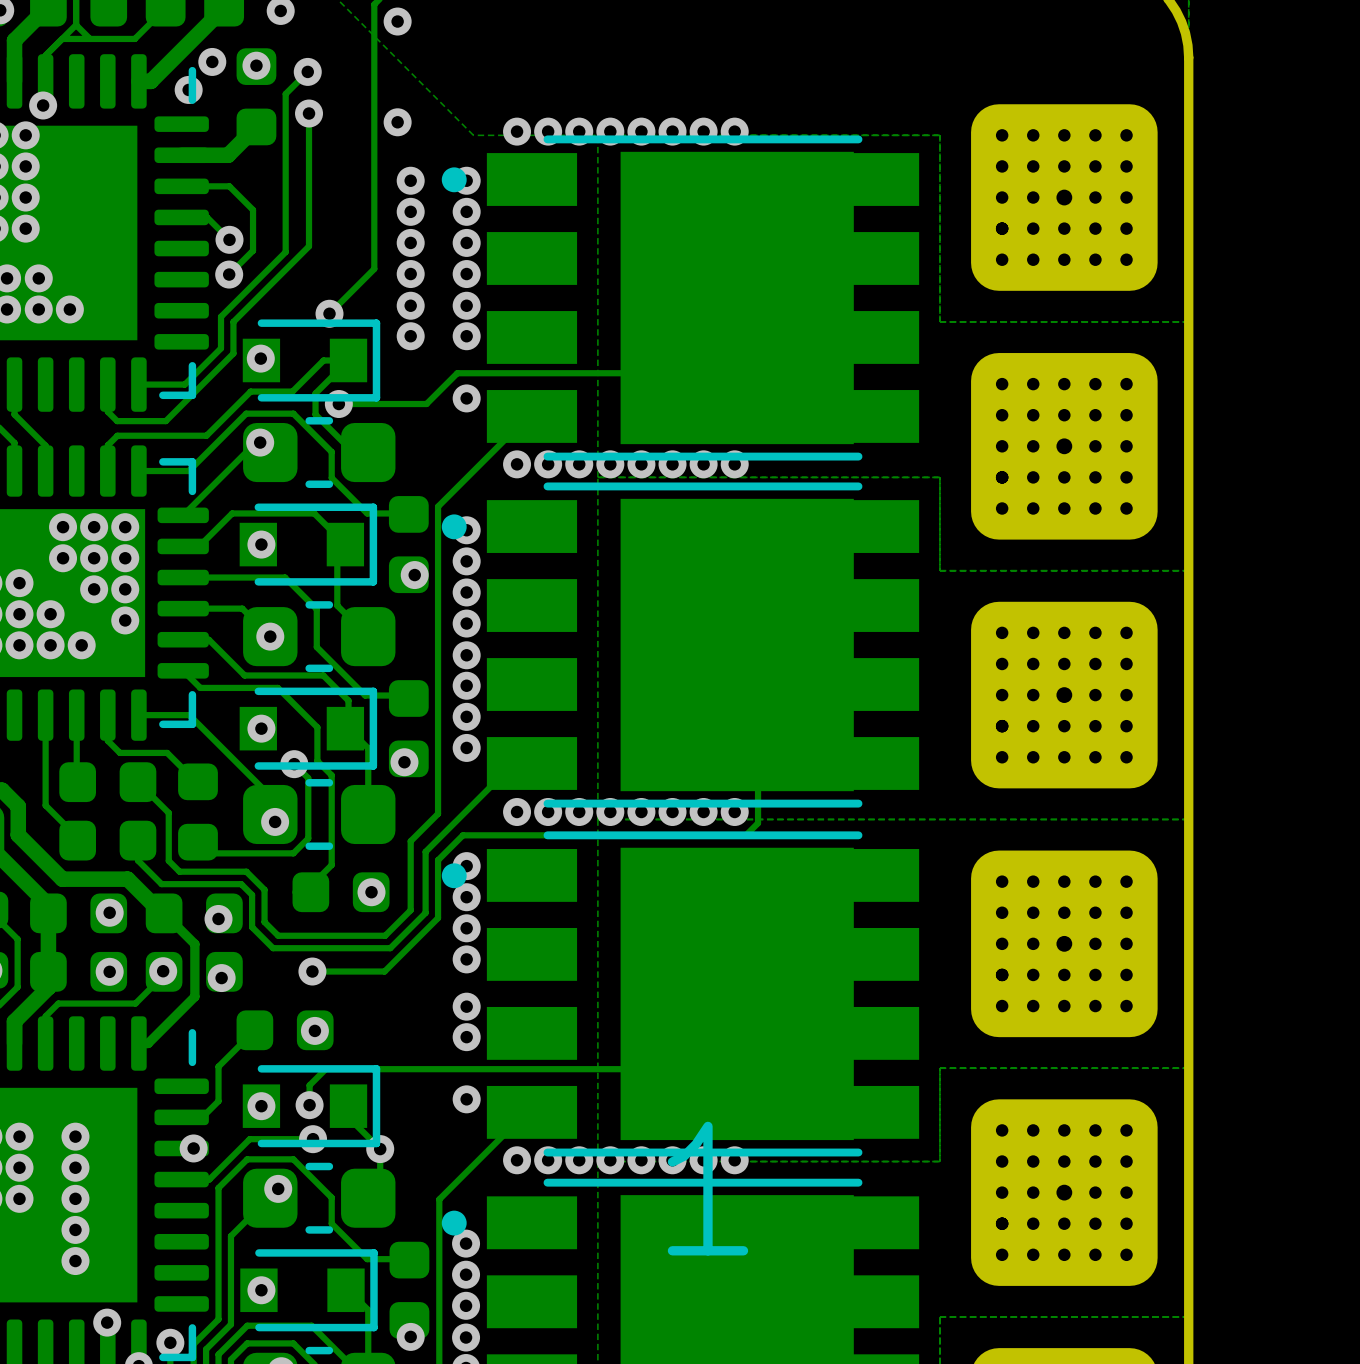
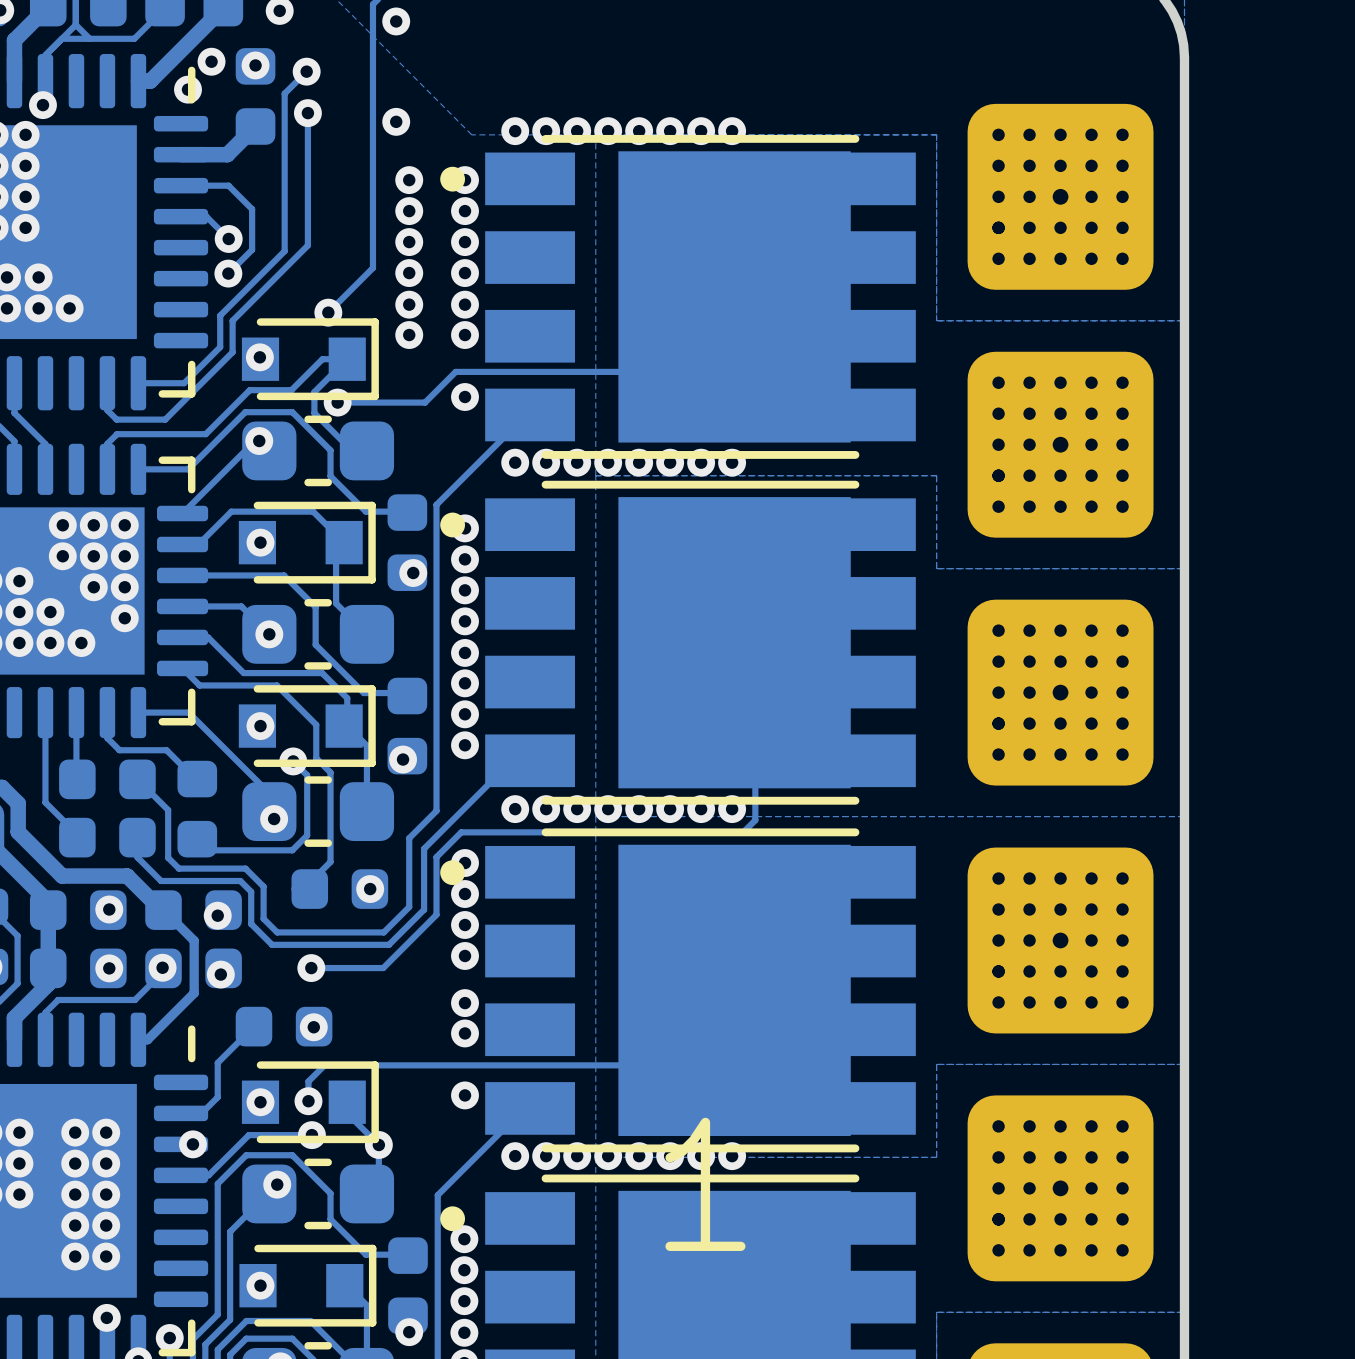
via: none -> (106, 1132)
via: none -> (106, 1163)
via: none -> (106, 1194)
via: none -> (106, 1225)
via: none -> (106, 1256)

